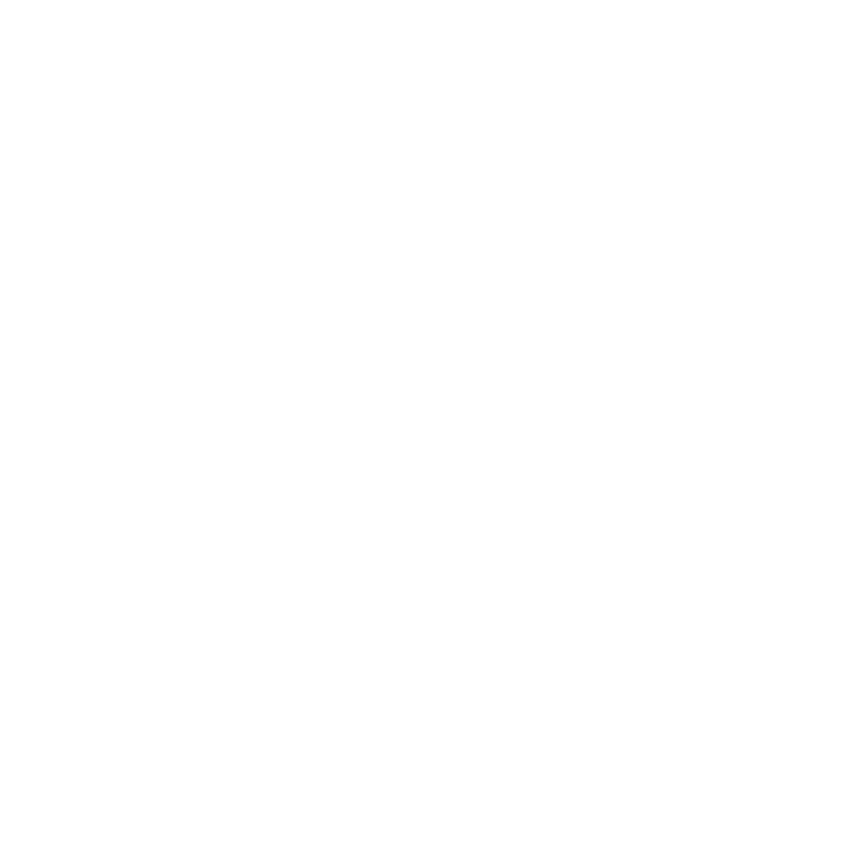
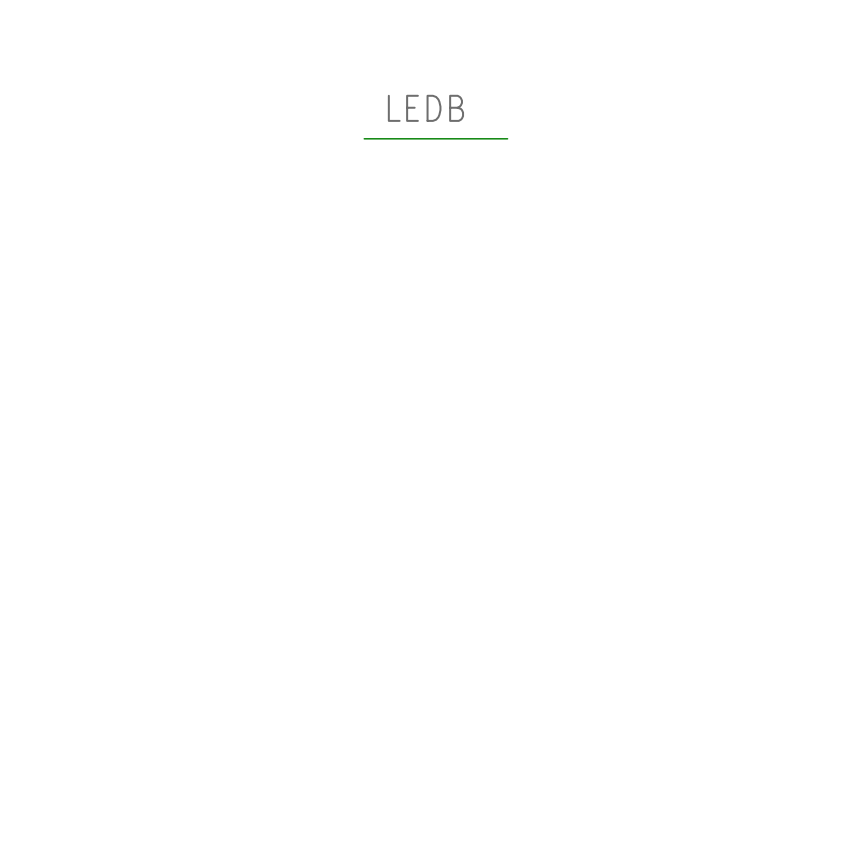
label: none -> LEDB (425, 108)
wire: none -> (364, 138) (507, 138)

